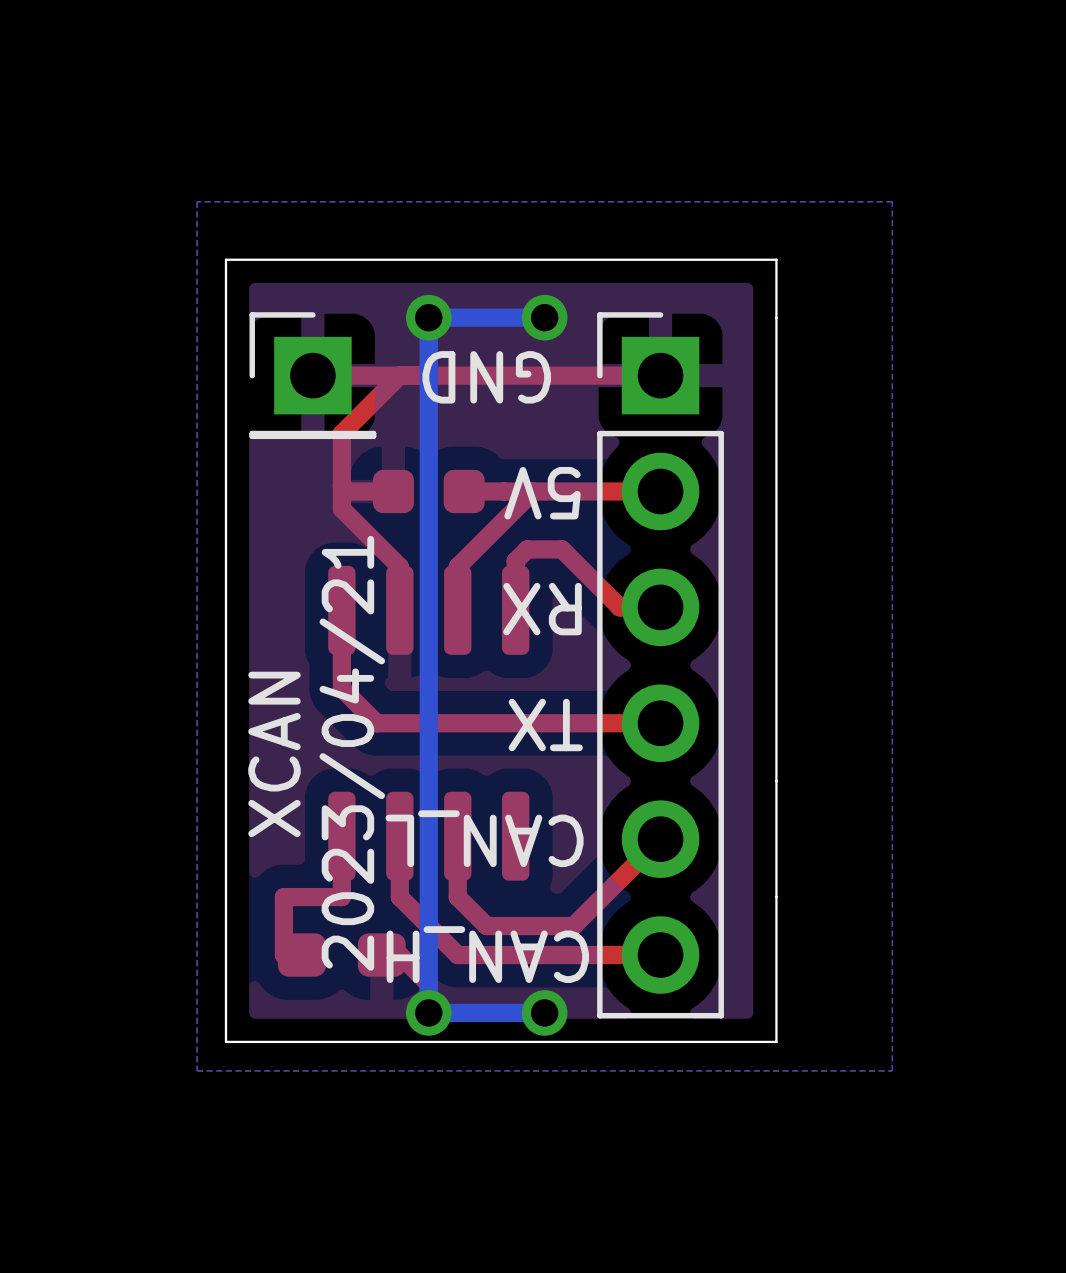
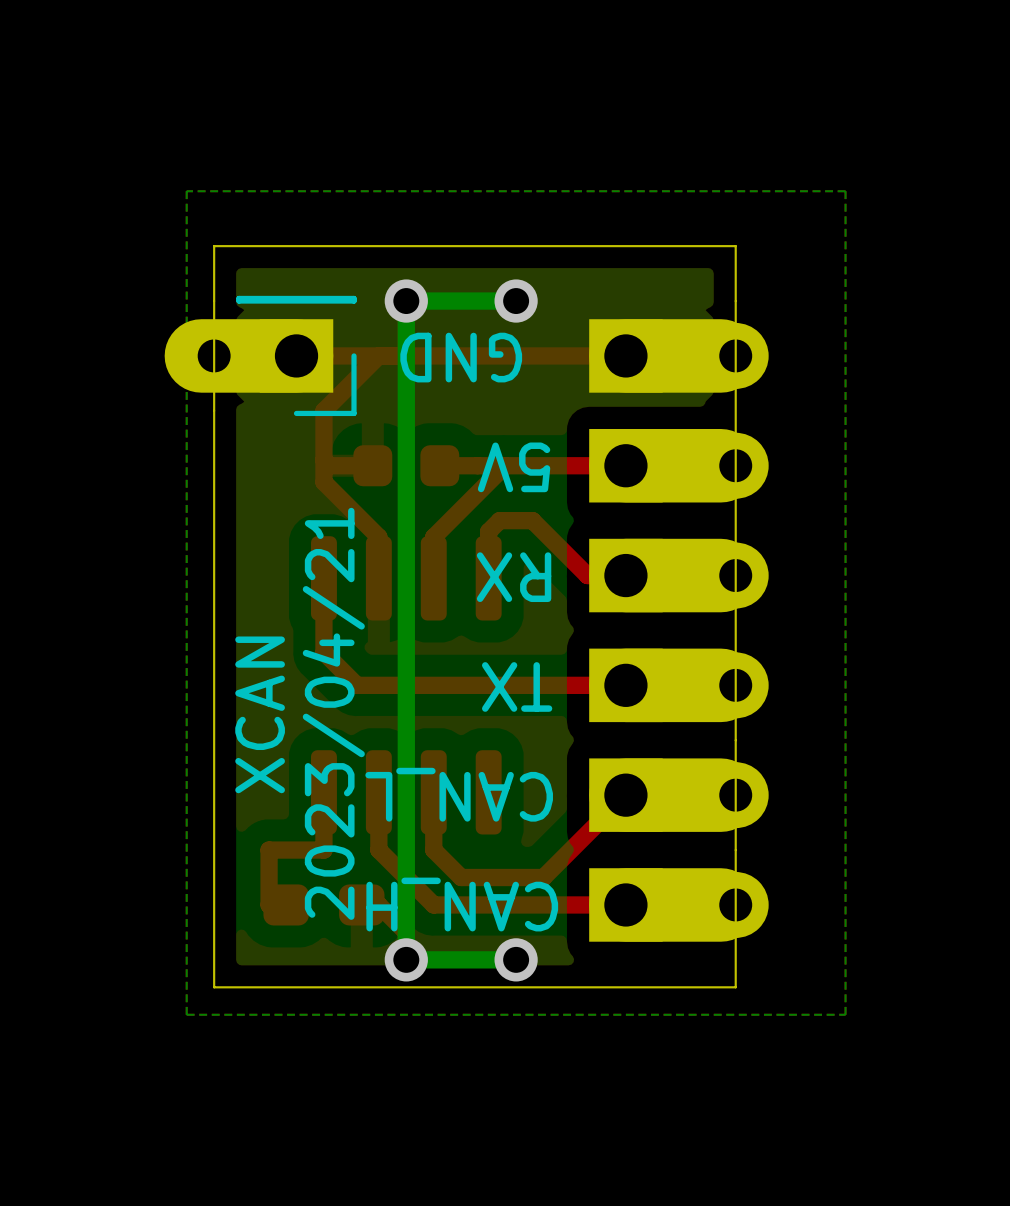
part footprint: [249, 312, 377, 440] -> [164, 295, 357, 417]
part: none -> (678, 355)
part: none -> (678, 465)
part: none -> (678, 575)
part: (660, 665) -> none
part: none -> (678, 685)
part: none -> (678, 795)
part: none -> (678, 904)

